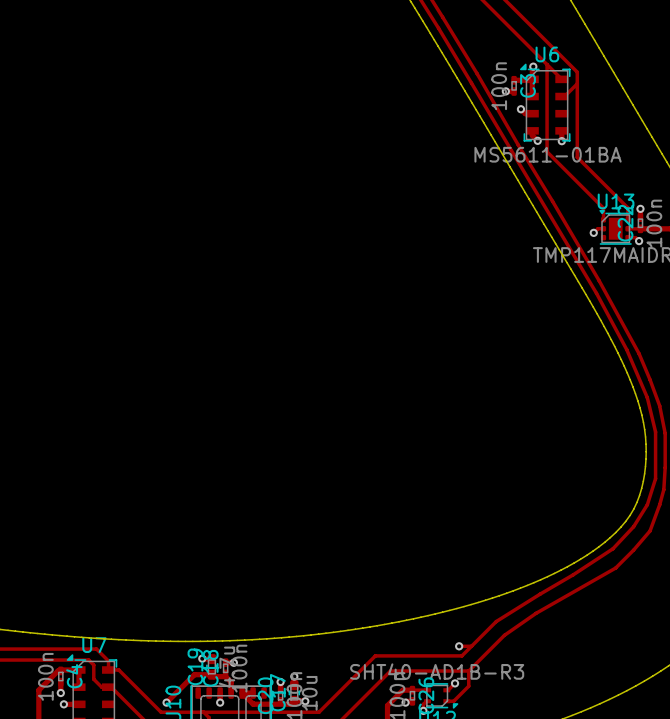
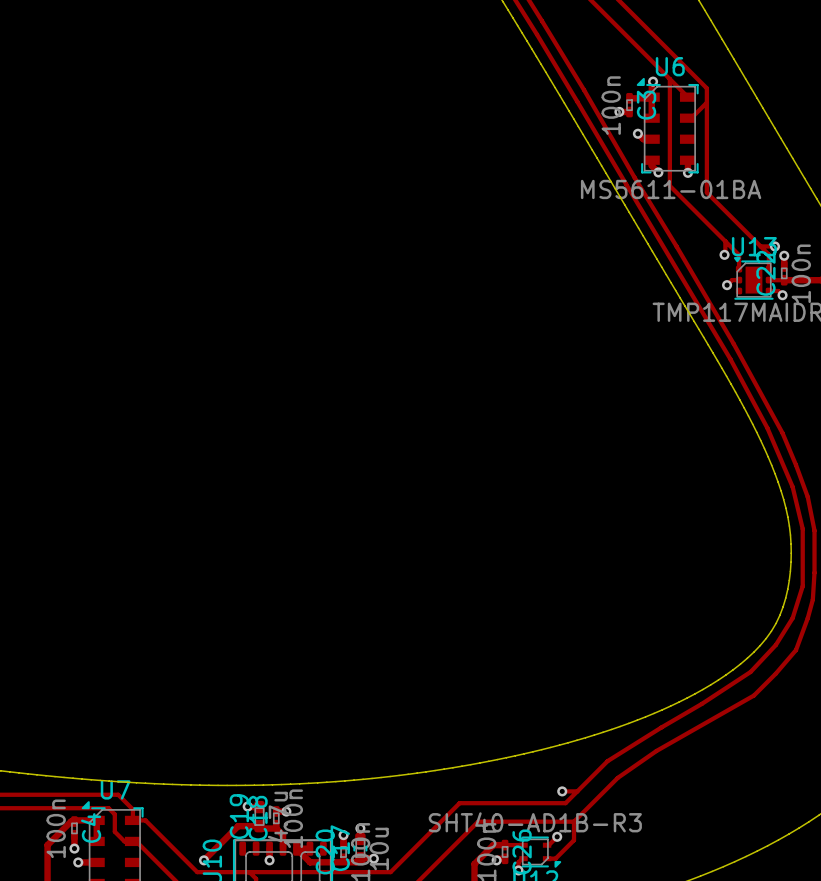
track: none -> (725, 241) (724, 254)
track: none -> (760, 246) (775, 246)
via: none -> (775, 246)
via: none -> (724, 254)

